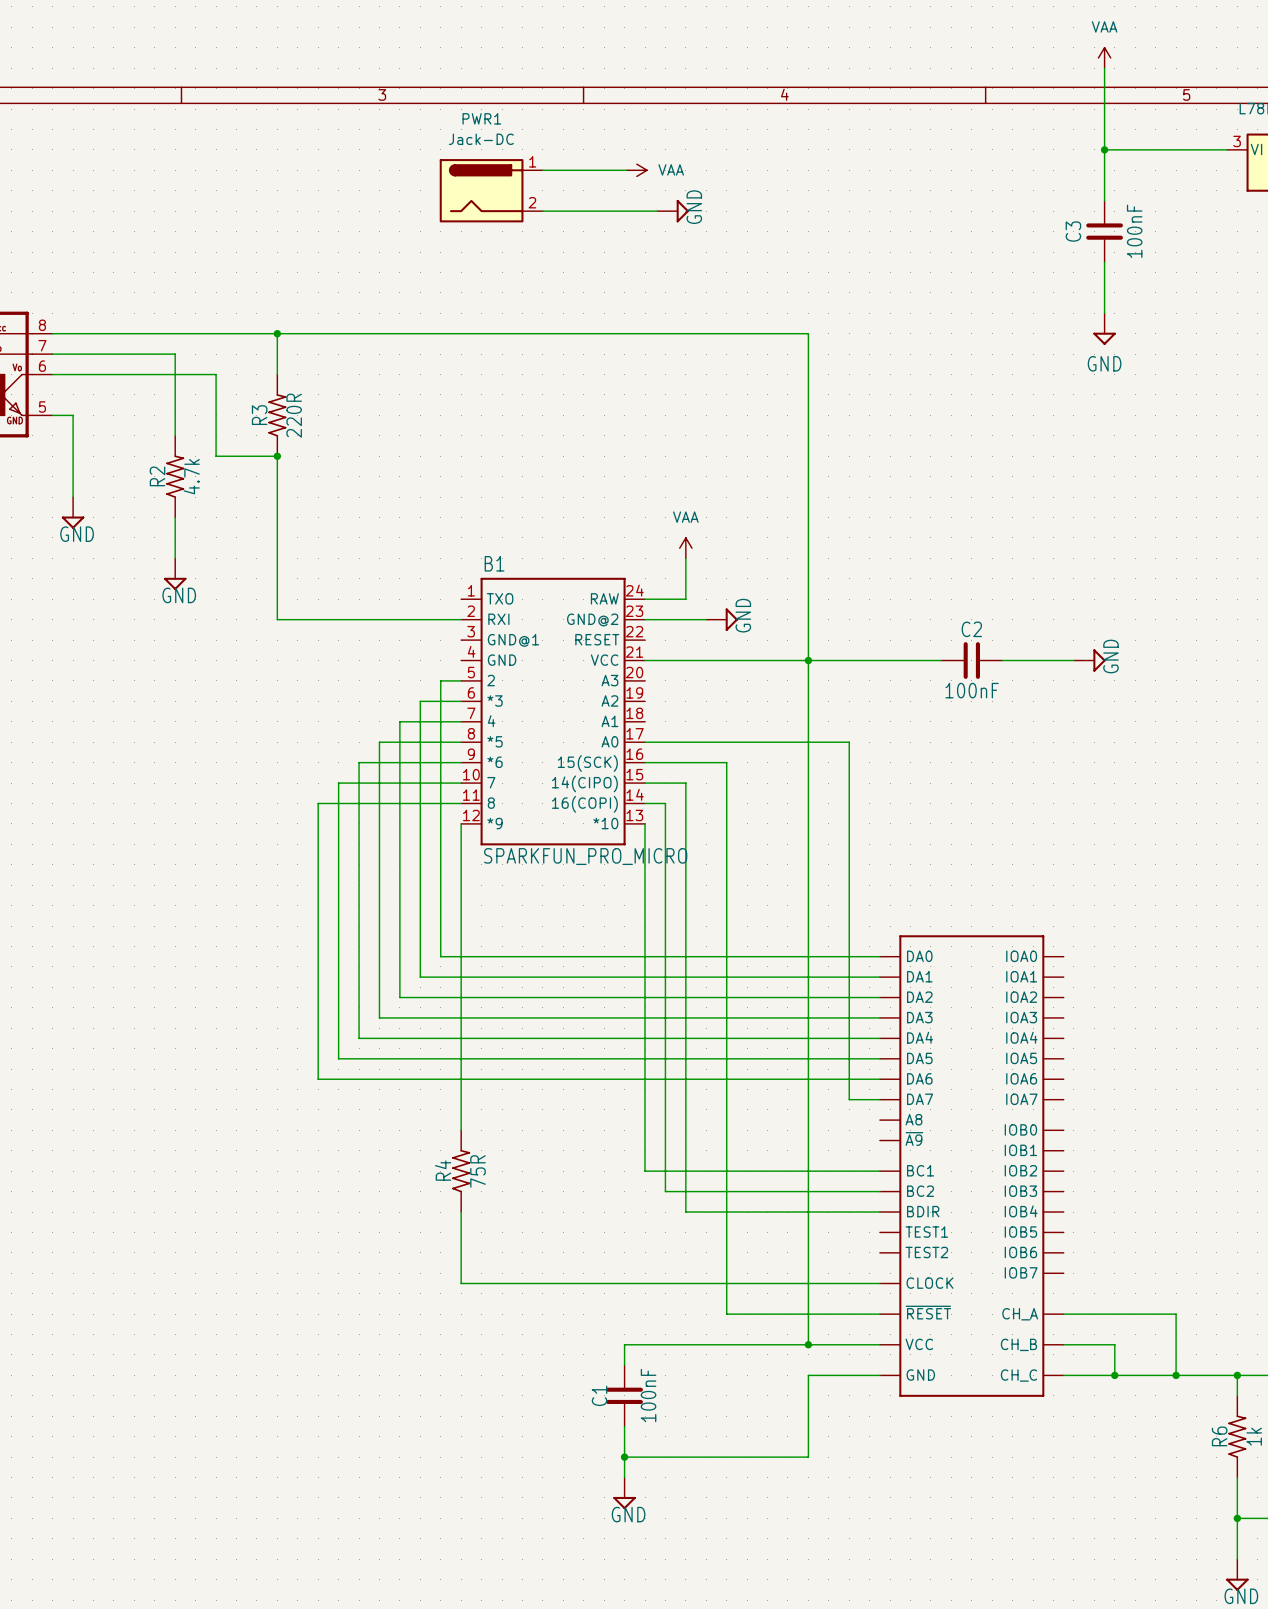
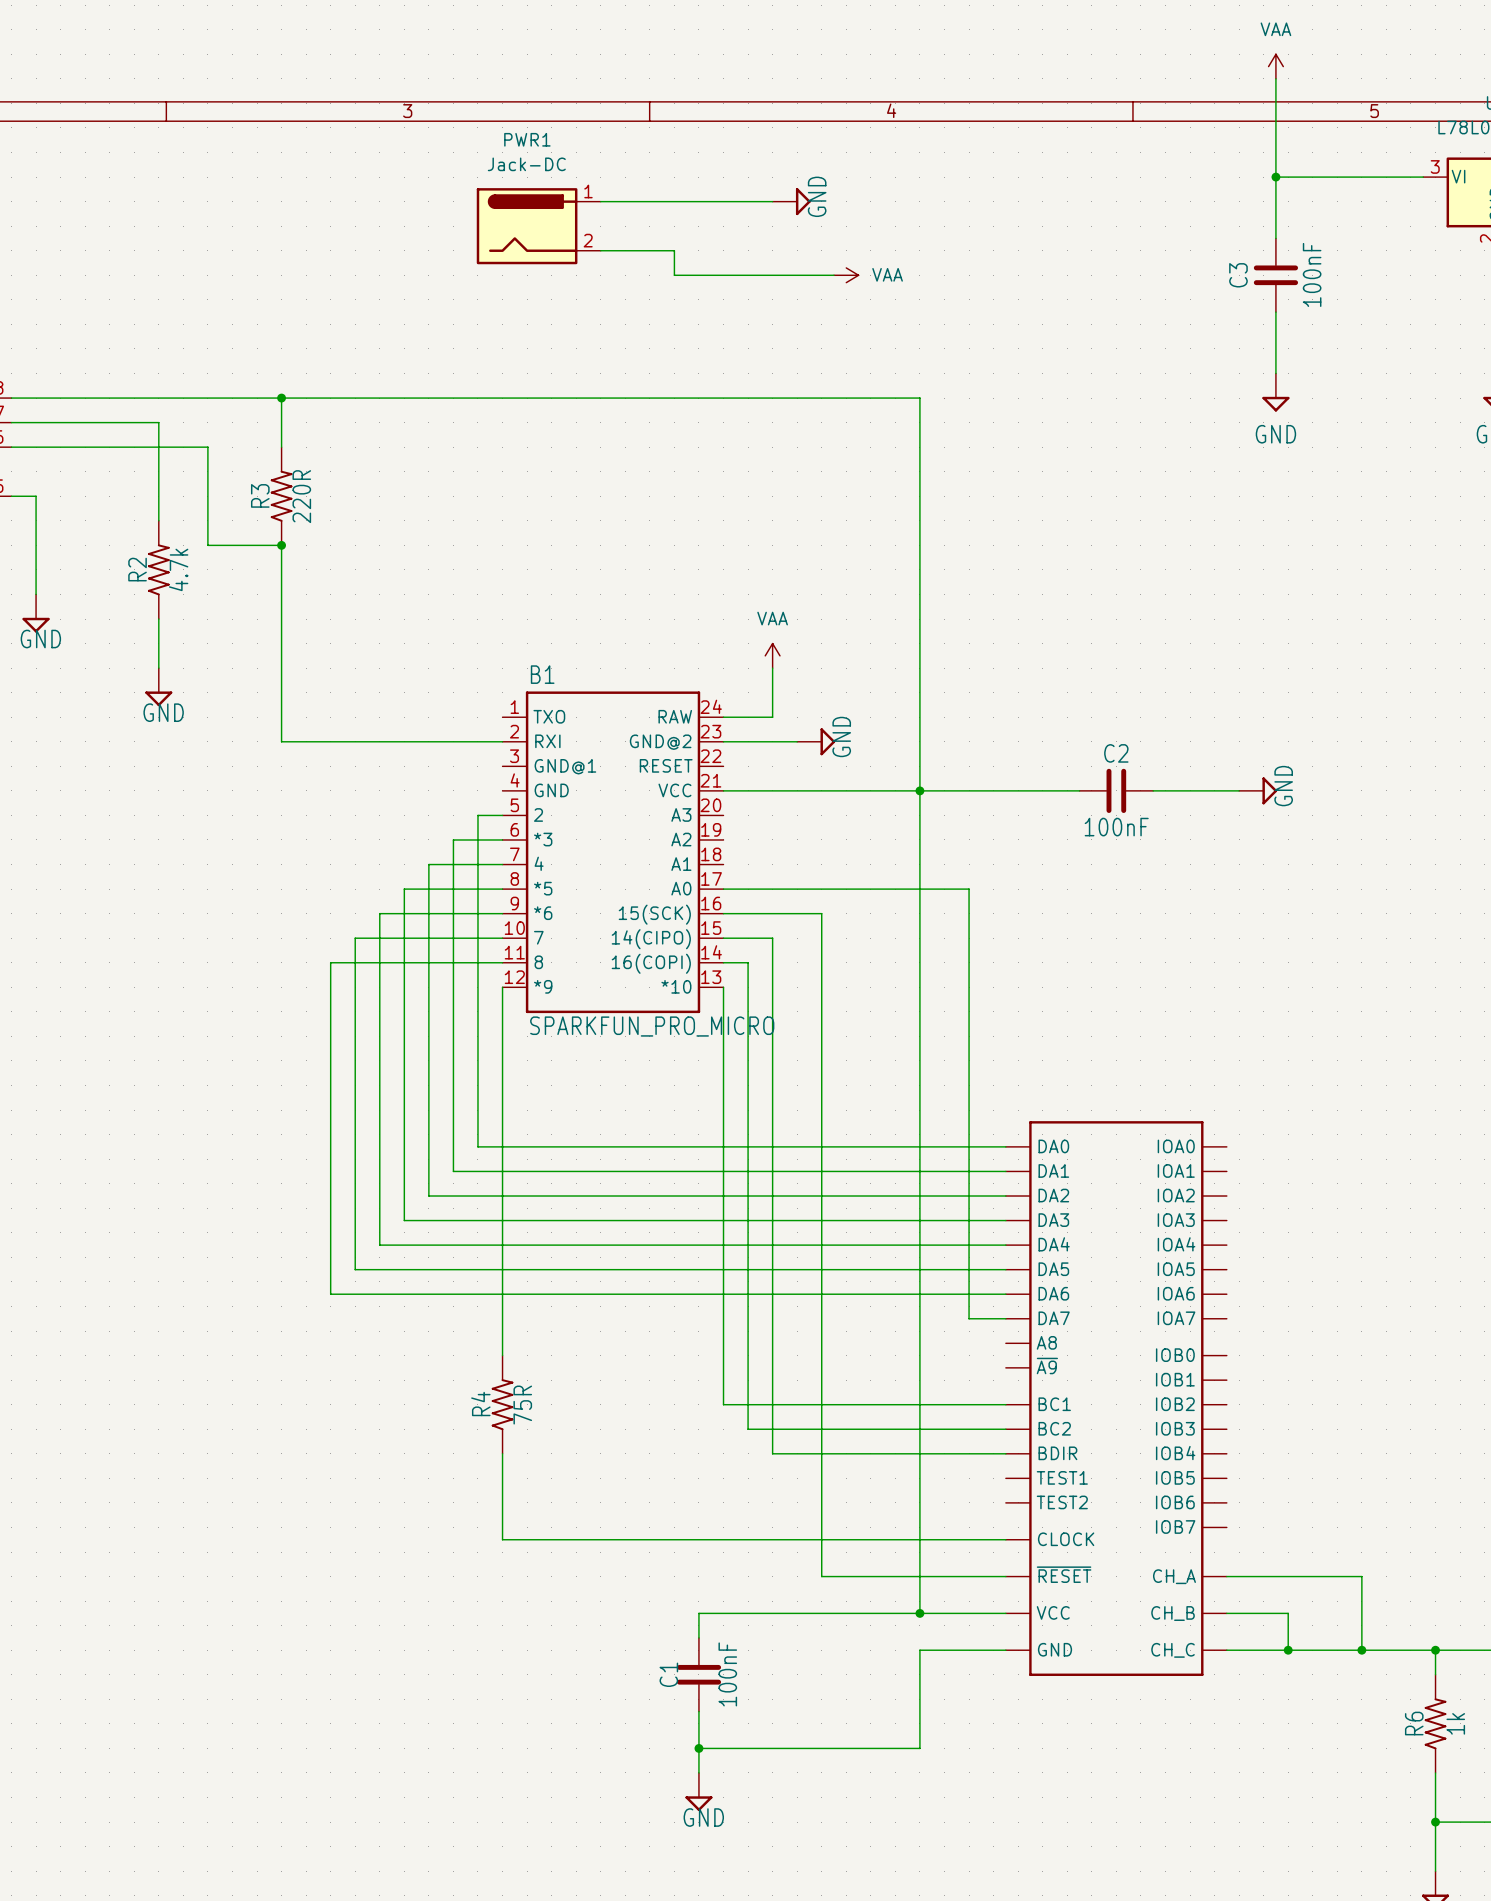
wire: none -> (701, 201) (772, 201)
power symbol position: VAA (636, 170) -> VAA (846, 275)
wire: (604, 211) (657, 211) -> (674, 250) (674, 275) (834, 275)
power symbol position: GND (673, 211) -> GND (791, 201)

